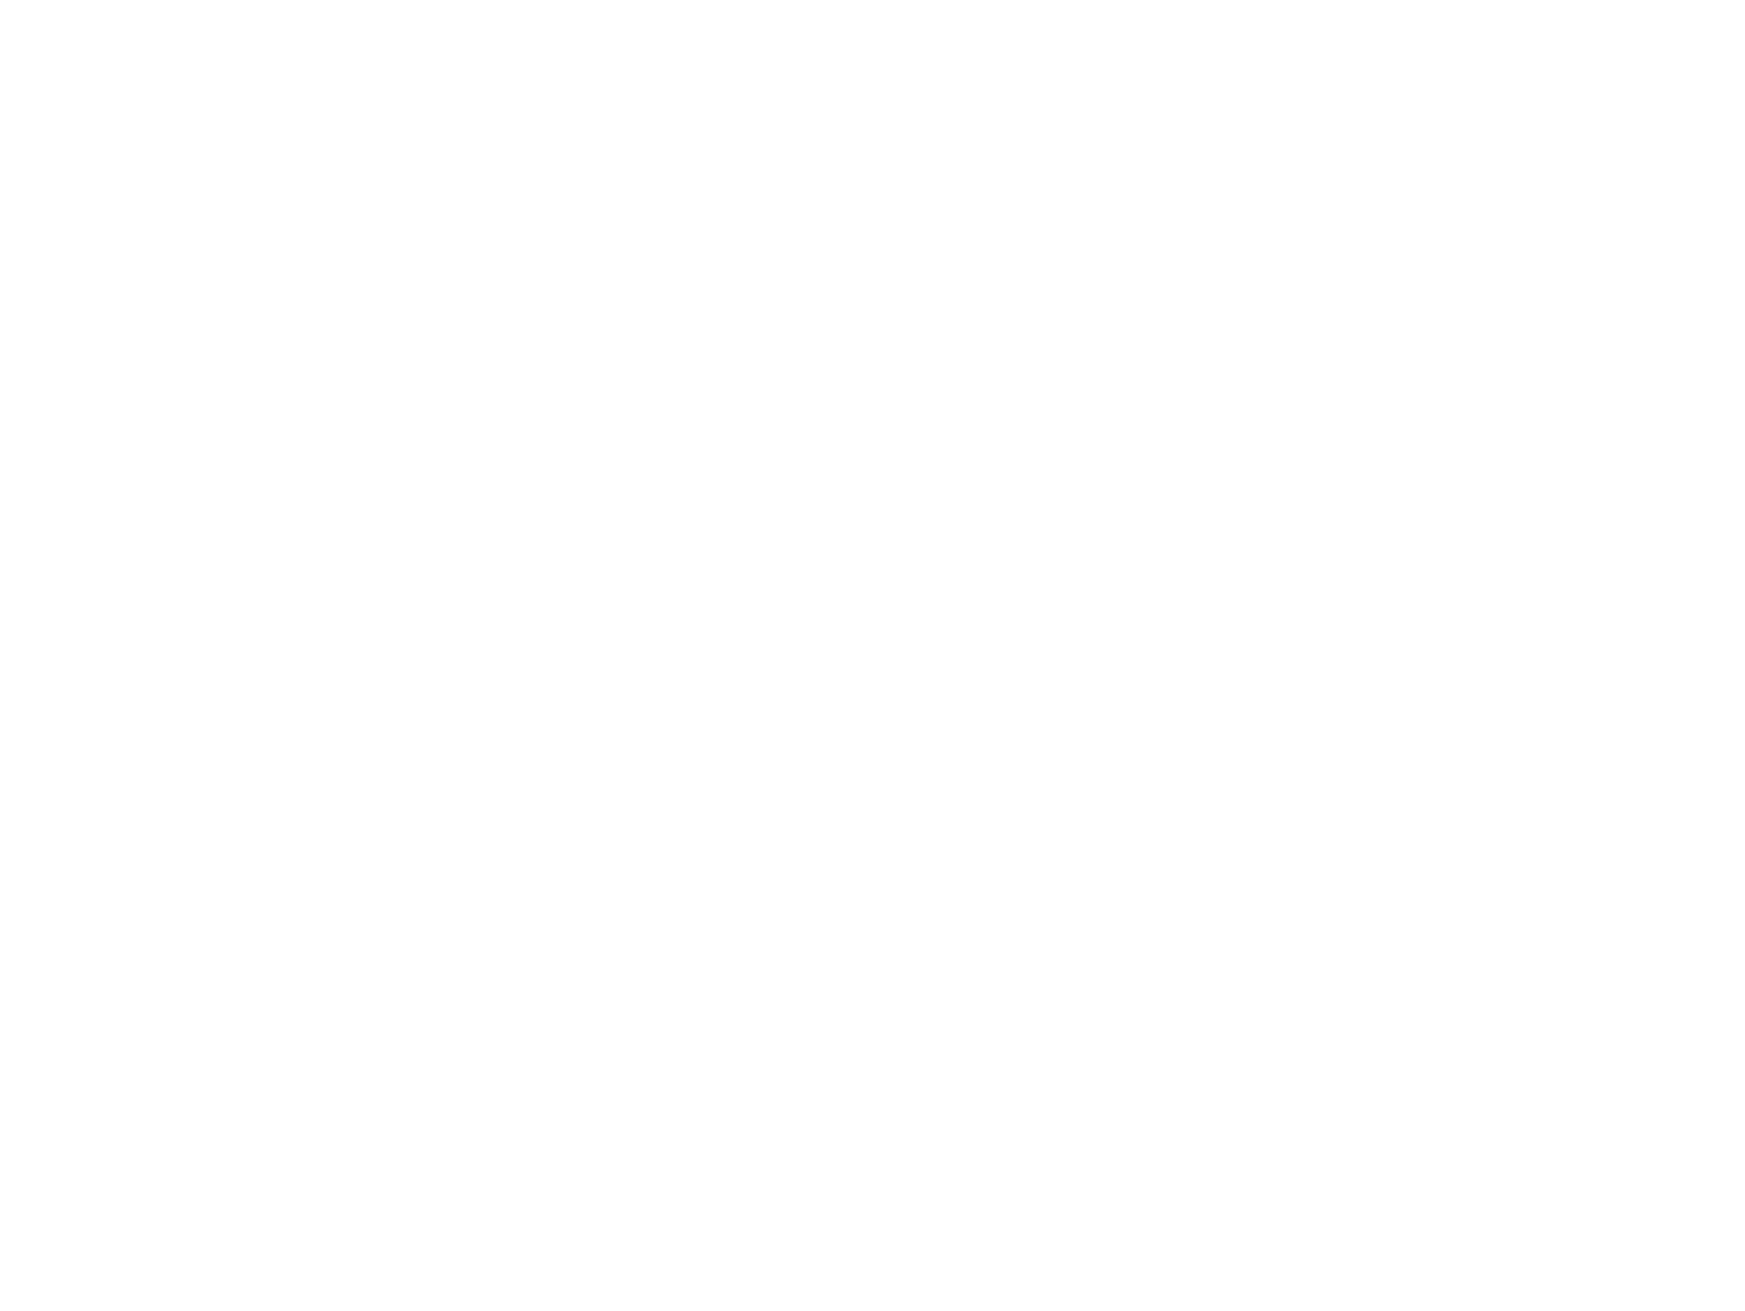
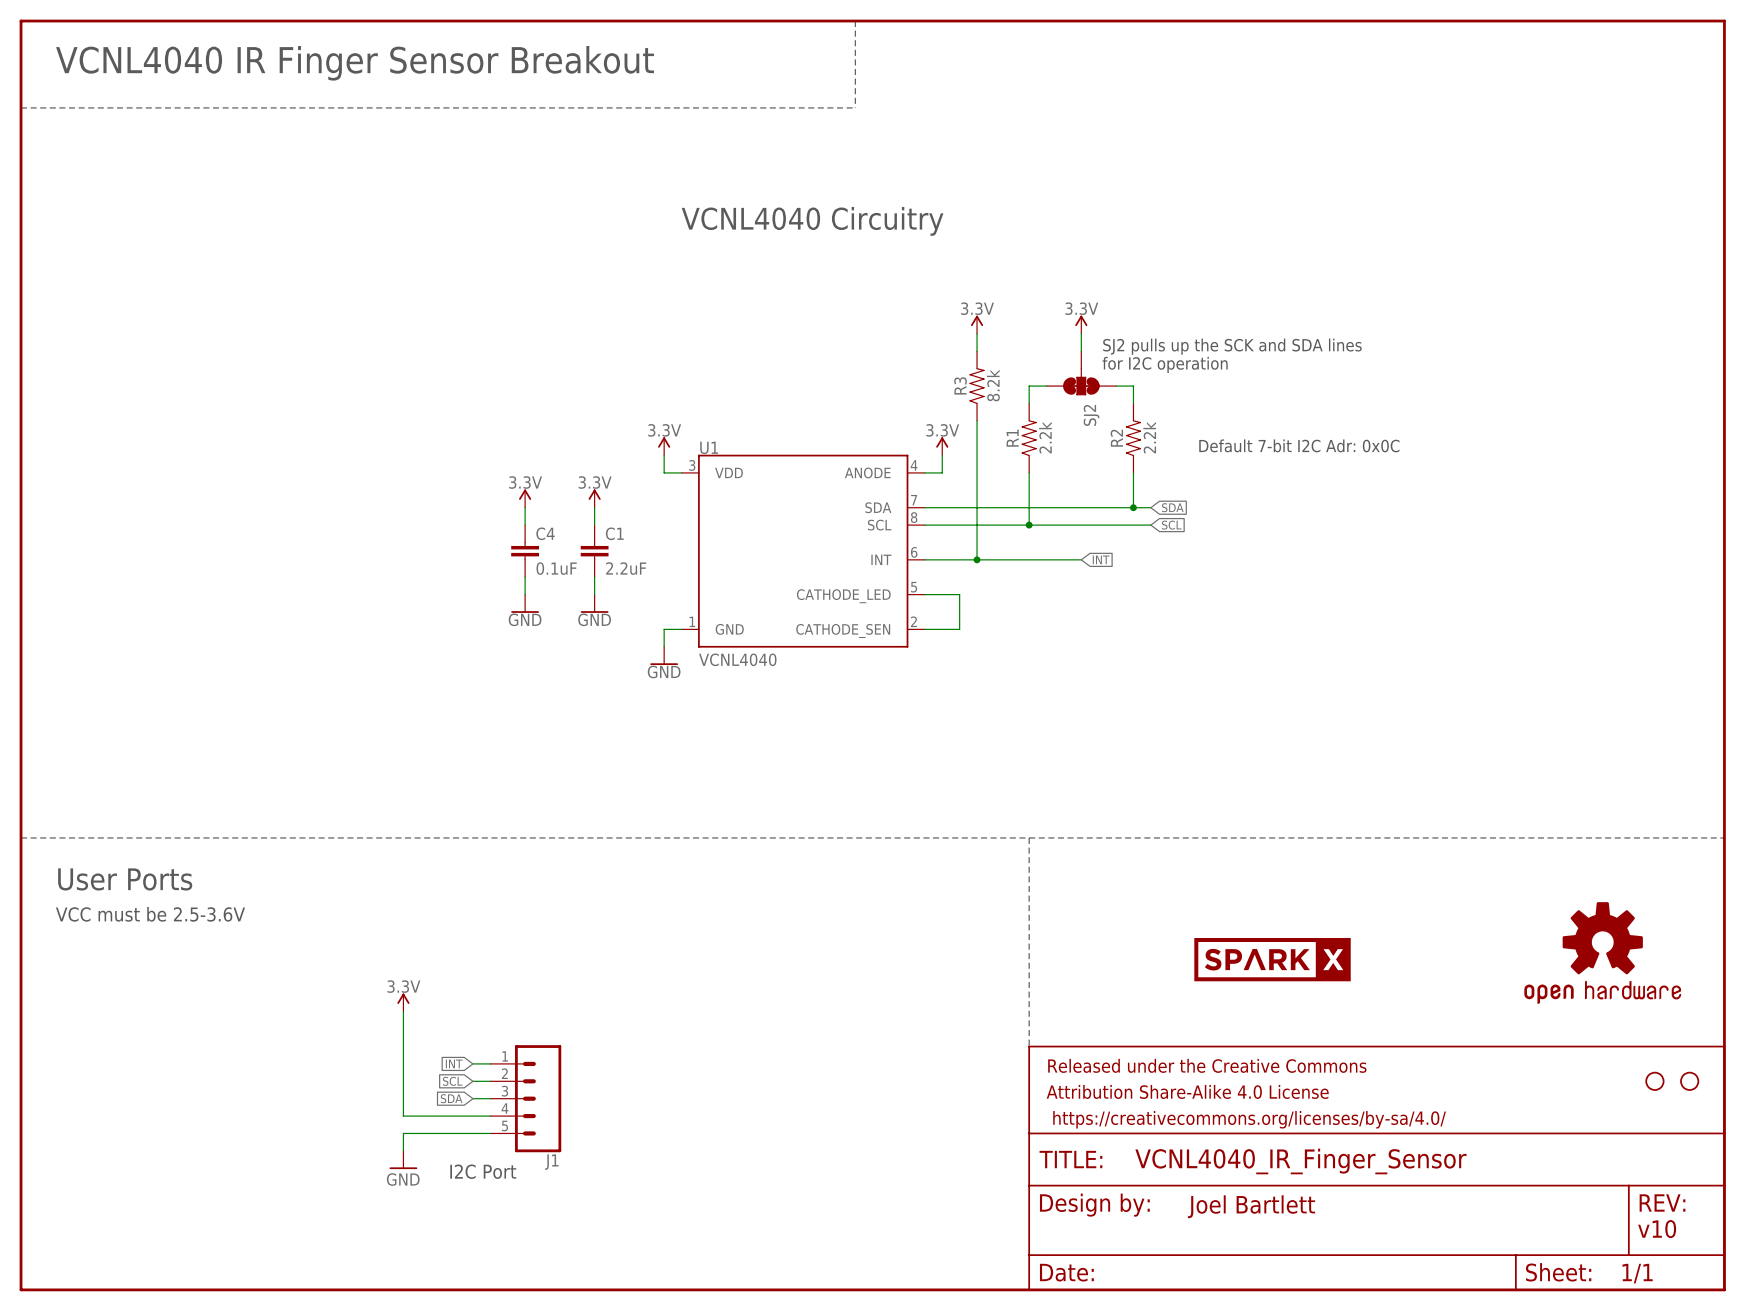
line: none -> (855, 21) (855, 107) (21, 107)
text: none -> VCNL4040 IR Finger Sensor Breakout (355, 63)
text: none -> VCNL4040 Circuitry (812, 221)
power symbol: none -> 3.3V (977, 324)
power symbol: none -> 3.3V (1081, 324)
wire: none -> (977, 333) (977, 351)
wire: none -> (1081, 333) (1081, 351)
text: none -> SJ2 pulls up the SCK and SDA lines (1232, 346)
text: none -> for I2C operation (1165, 364)
SJ2: none -> (1081, 373)
R3: none -> 8.2k (977, 386)
wire: none -> (1046, 386) (1029, 386) (1029, 403)
wire: none -> (1116, 386) (1133, 386) (1133, 403)
wire: none -> (977, 420) (977, 559)
R1: none -> 2.2k (1029, 438)
R2: none -> 2.2k (1133, 438)
power symbol: none -> 3.3V (664, 446)
power symbol: none -> 3.3V (942, 446)
text: none -> Default 7-bit I2C Adr: 0x0C (1299, 445)
wire: none -> (664, 455) (664, 472) (681, 472)
wire: none -> (942, 455) (942, 472) (924, 472)
wire: none -> (1029, 472) (1029, 525)
wire: none -> (1133, 472) (1133, 507)
power symbol: none -> 3.3V (525, 498)
power symbol: none -> 3.3V (594, 498)
wire: none -> (525, 507) (525, 525)
wire: none -> (594, 507) (594, 525)
wire: none -> (924, 507) (1150, 507)
junction: none -> (1133, 507)
global label: none -> SDA (1172, 507)
wire: none -> (924, 525) (1150, 525)
junction: none -> (1029, 525)
global label: none -> SCL (1171, 525)
C4: none -> 0.1uF (525, 551)
C1: none -> 2.2uF (594, 551)
U1: none -> VCNL4040 (803, 551)
wire: none -> (924, 559) (1081, 559)
junction: none -> (977, 559)
global label: none -> INT (1101, 559)
wire: none -> (525, 577) (525, 594)
wire: none -> (594, 577) (594, 594)
wire: none -> (924, 594) (959, 594) (959, 629) (924, 629)
power symbol: none -> GND (525, 603)
power symbol: none -> GND (594, 603)
wire: none -> (681, 629) (664, 629) (664, 646)
power symbol: none -> GND (664, 655)
part: none -> (872, 655)
line: none -> (21, 837) (1724, 837)
line: none -> (1029, 837) (1029, 1046)
text: none -> User Ports (125, 879)
text: none -> VCC must be 2.5-3.6V (150, 914)
part: none -> (1602, 953)
part: none -> (1272, 959)
power symbol: none -> 3.3V (403, 1002)
wire: none -> (403, 1011) (403, 1116) (490, 1116)
global label: none -> INT (454, 1063)
wire: none -> (472, 1063) (490, 1063)
global label: none -> SCL (452, 1081)
wire: none -> (472, 1081) (490, 1081)
part: none -> (1654, 1081)
part: none -> (1689, 1081)
global label: none -> SDA (451, 1098)
wire: none -> (472, 1098) (490, 1098)
J1: none -> (525, 1098)
wire: none -> (490, 1133) (403, 1133) (403, 1150)
power symbol: none -> GND (403, 1159)
part: none -> (1376, 1168)
text: none -> I2C Port (483, 1171)
text: none -> Joel Bartlett (1251, 1206)
text: none -> v10 (1657, 1229)

